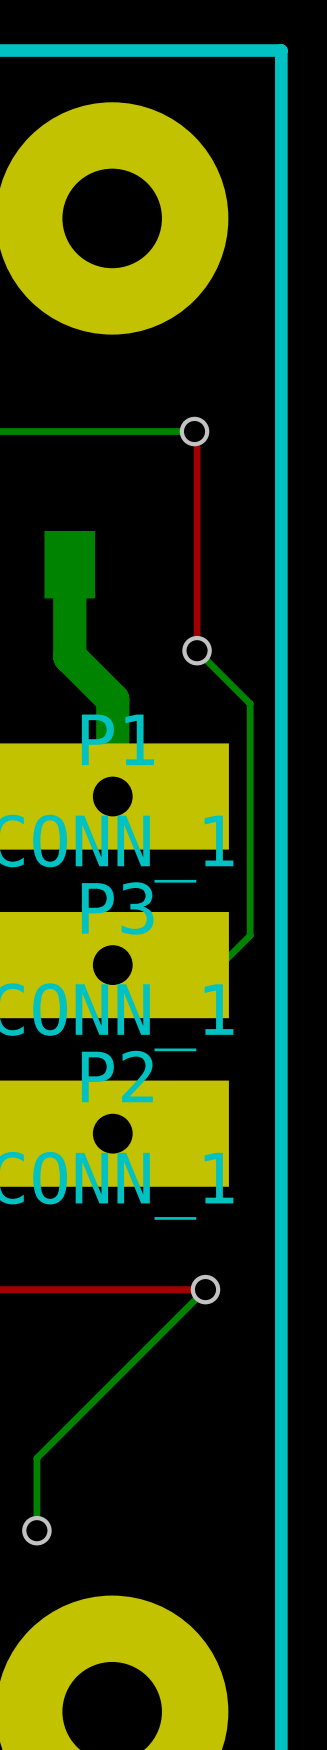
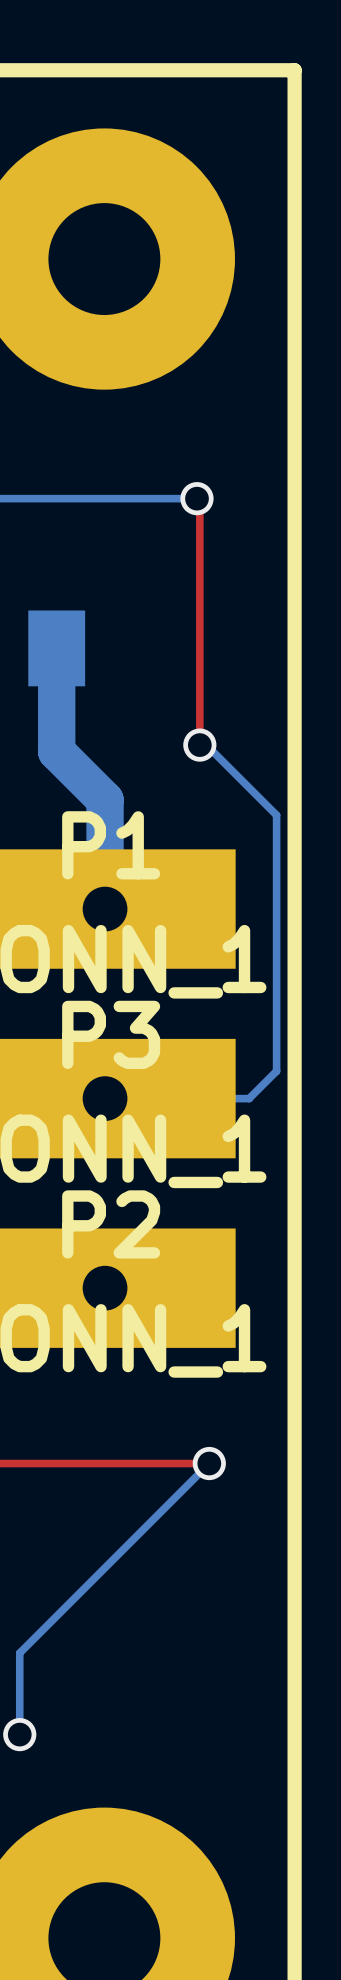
bottom track: (197, 650) (250, 703) (250, 935) (220, 965) -> (199, 745) (206, 745) (276, 815) (276, 1071) (249, 1098) (226, 1098)

